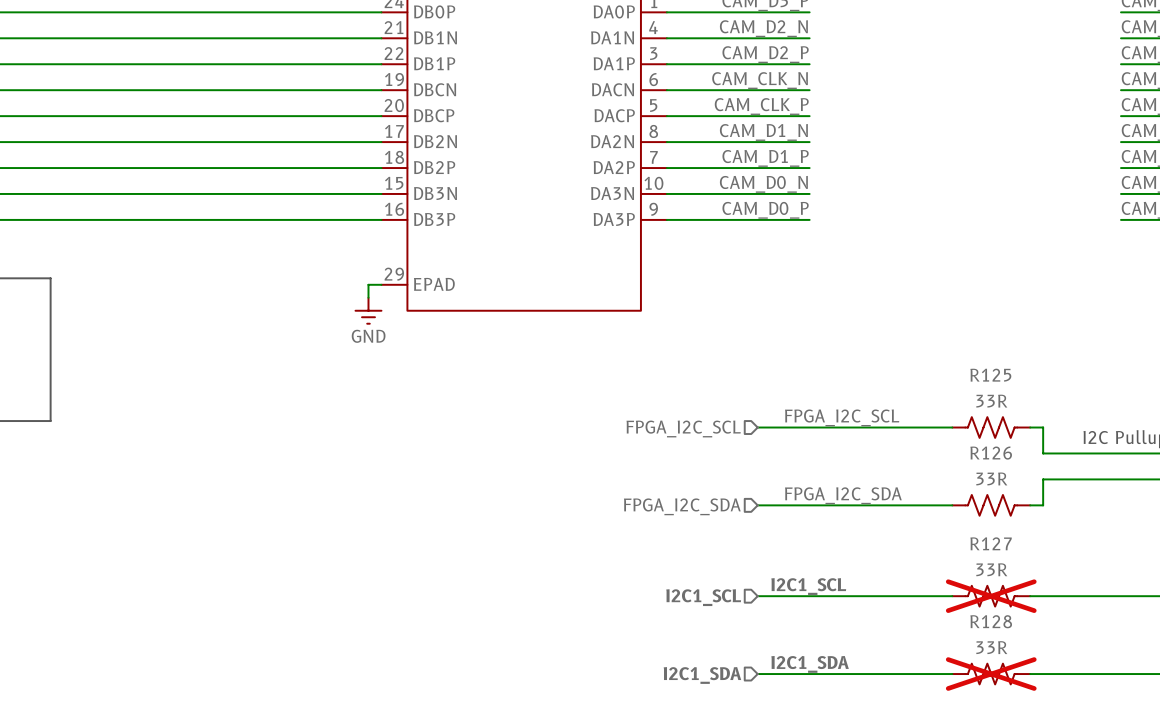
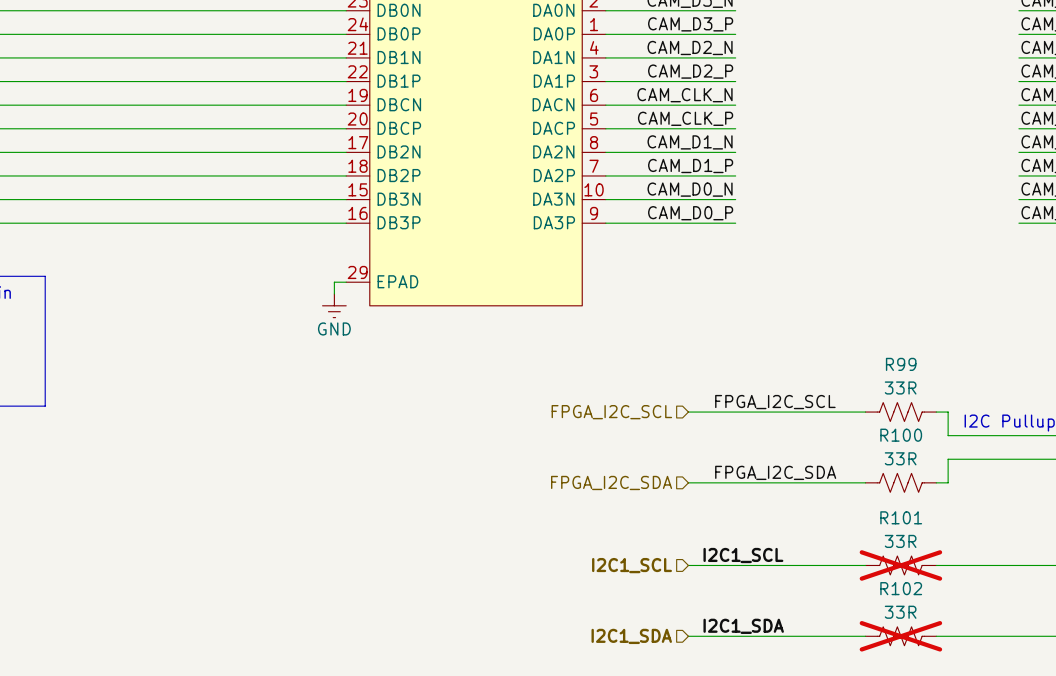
R125 name: R125 (990, 375) -> R99 (901, 364)
R126 name: R126 (991, 453) -> R100 (901, 435)
R127 name: R127 (991, 543) -> R101 (901, 517)
R128 name: R128 (991, 621) -> R102 (901, 588)

